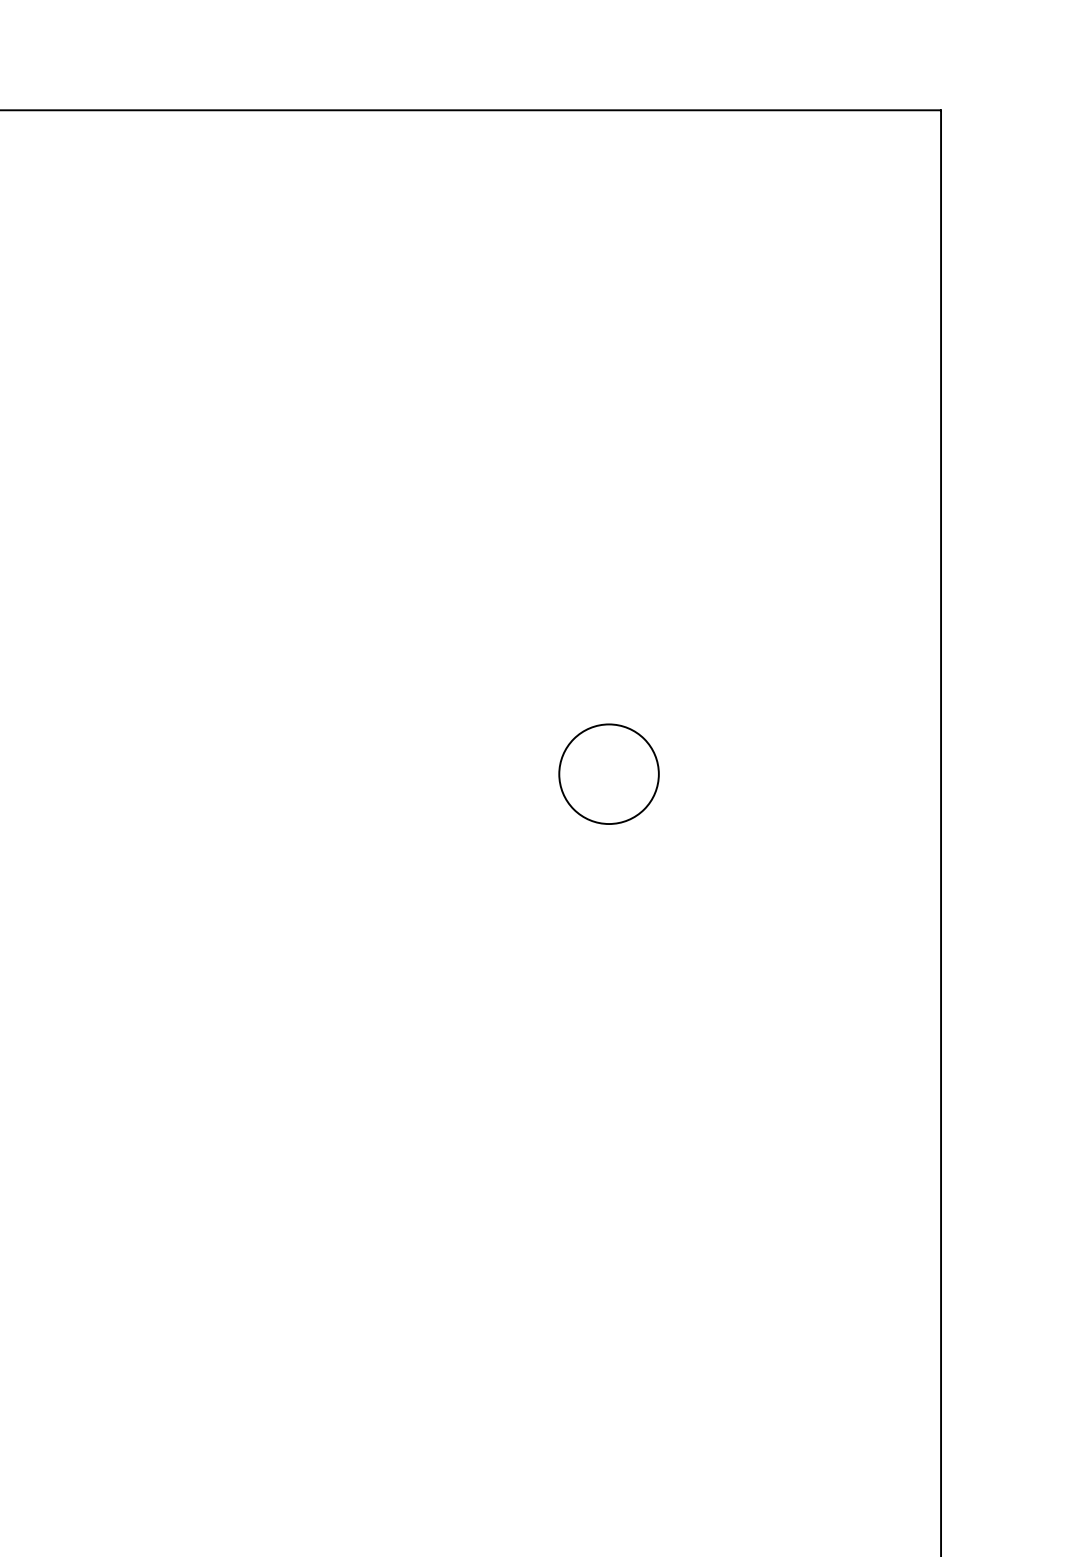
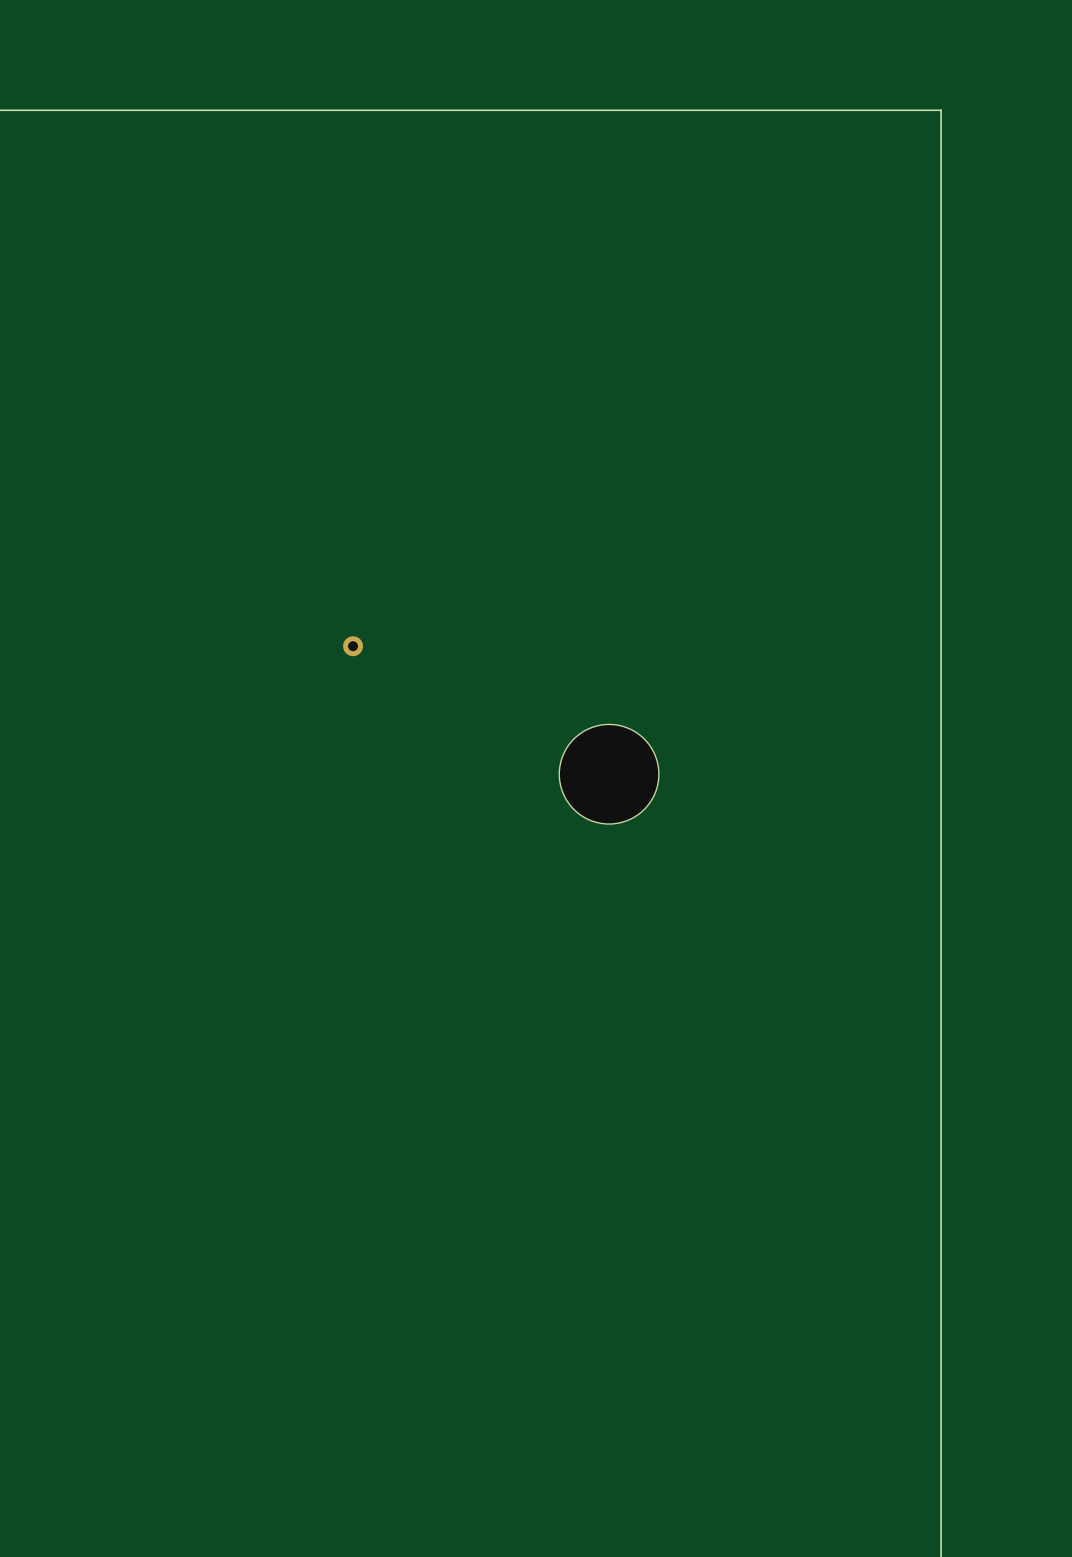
via: none -> (353, 646)

